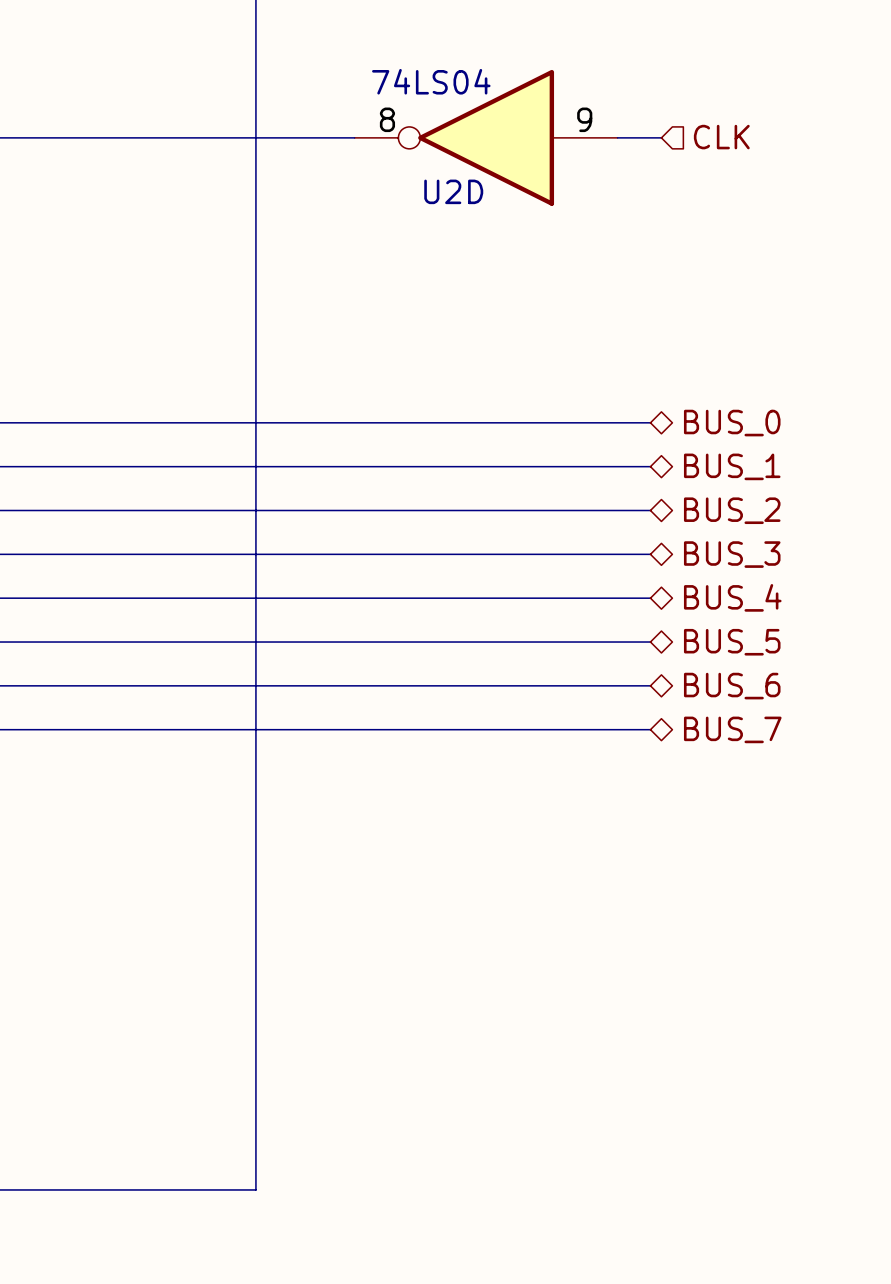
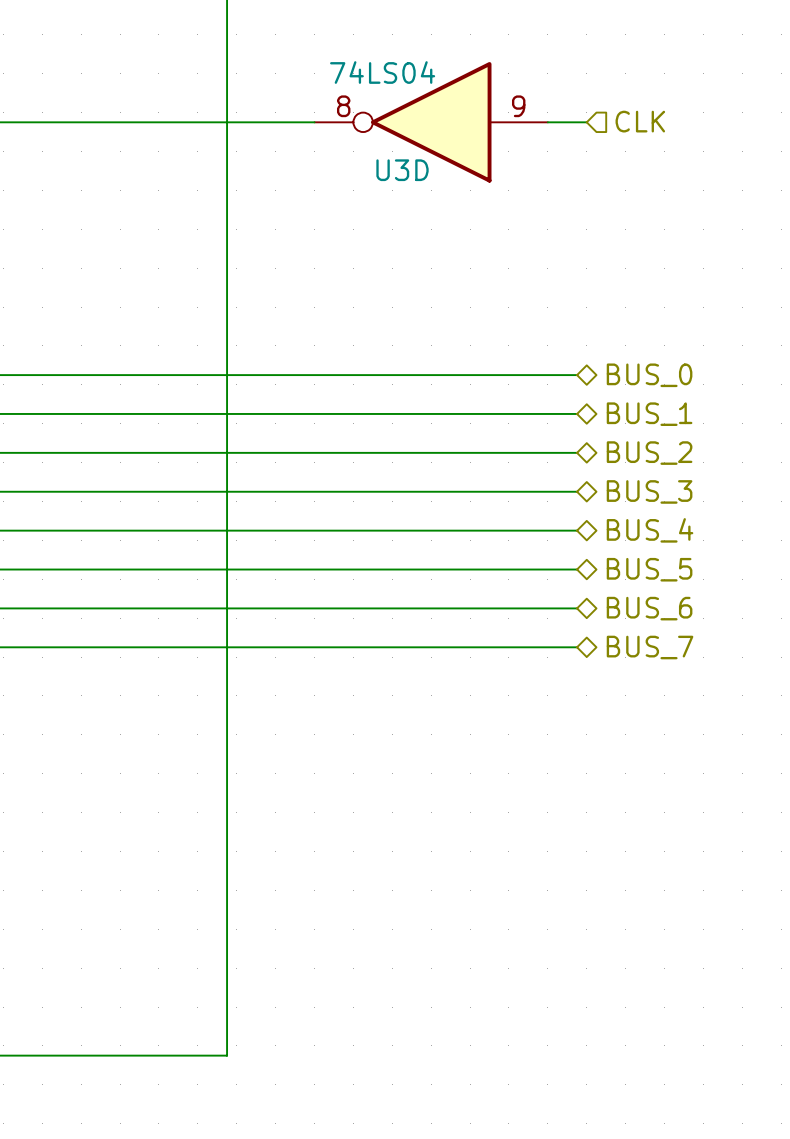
U2D name: U2D (453, 191) -> U3D (402, 170)

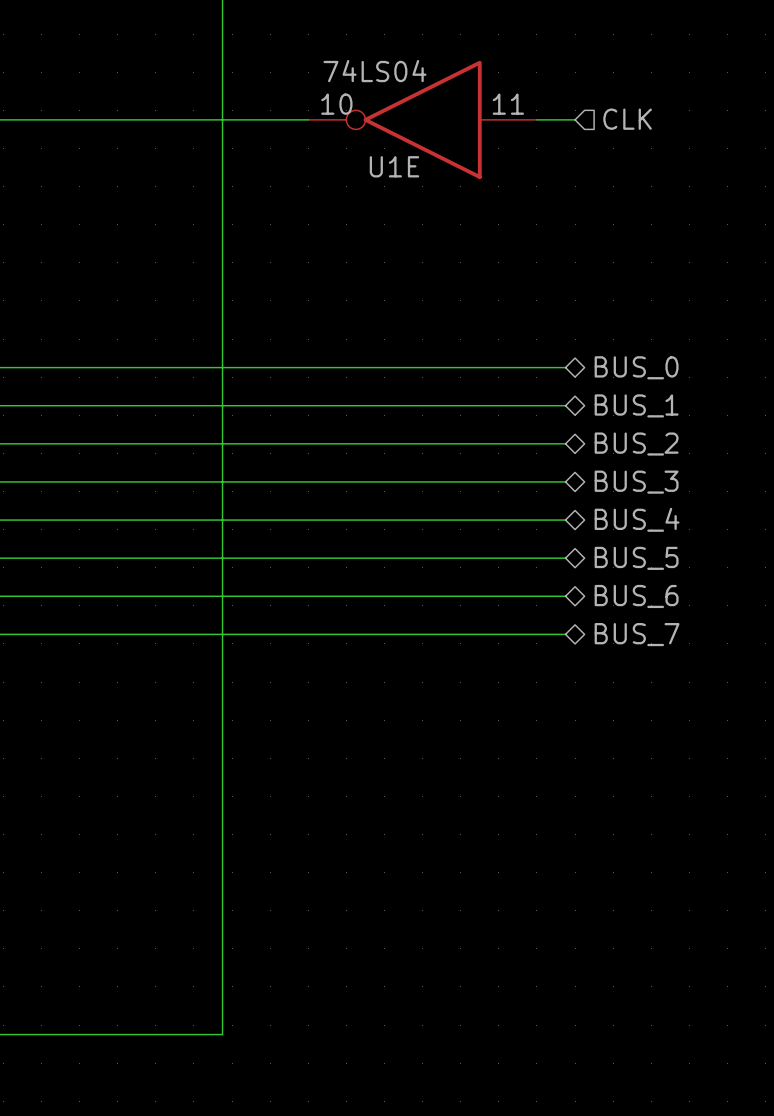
U3D pin number: 8 (343, 106) -> 10 (336, 104)
U3D pin number: 9 (518, 106) -> 11 (508, 104)
U3D name: U3D (402, 170) -> U1E (394, 166)

